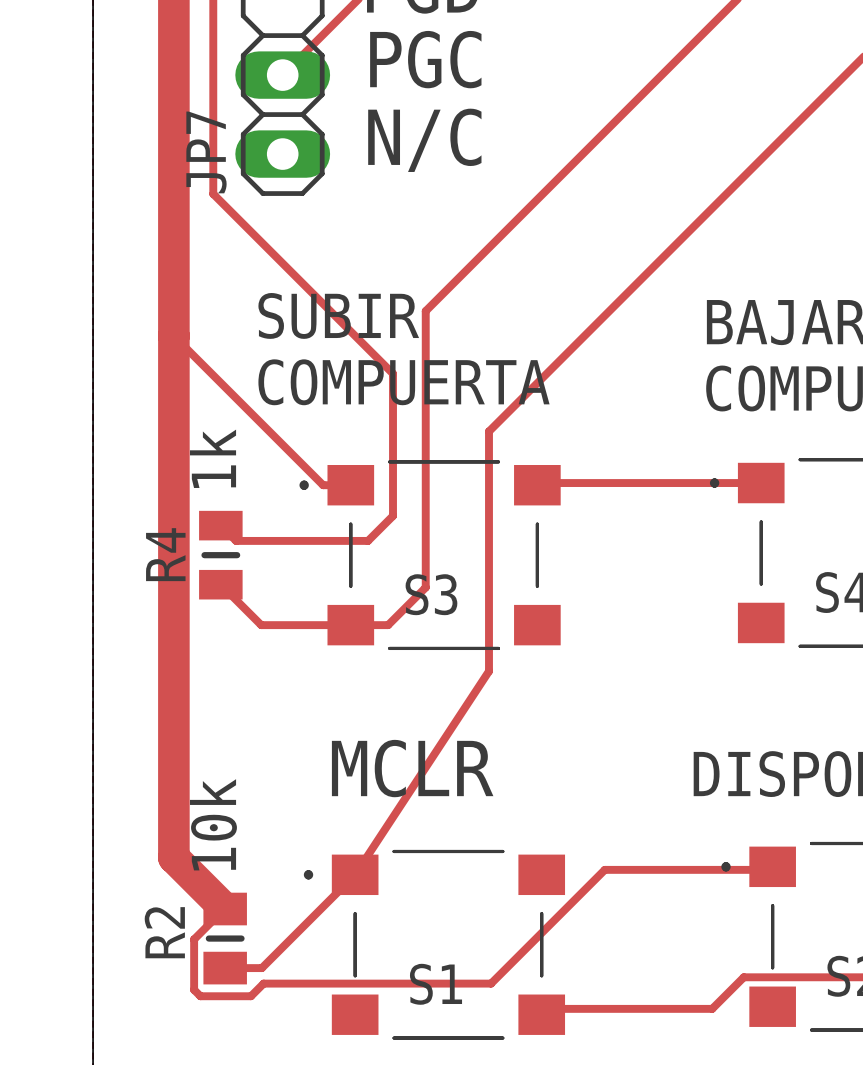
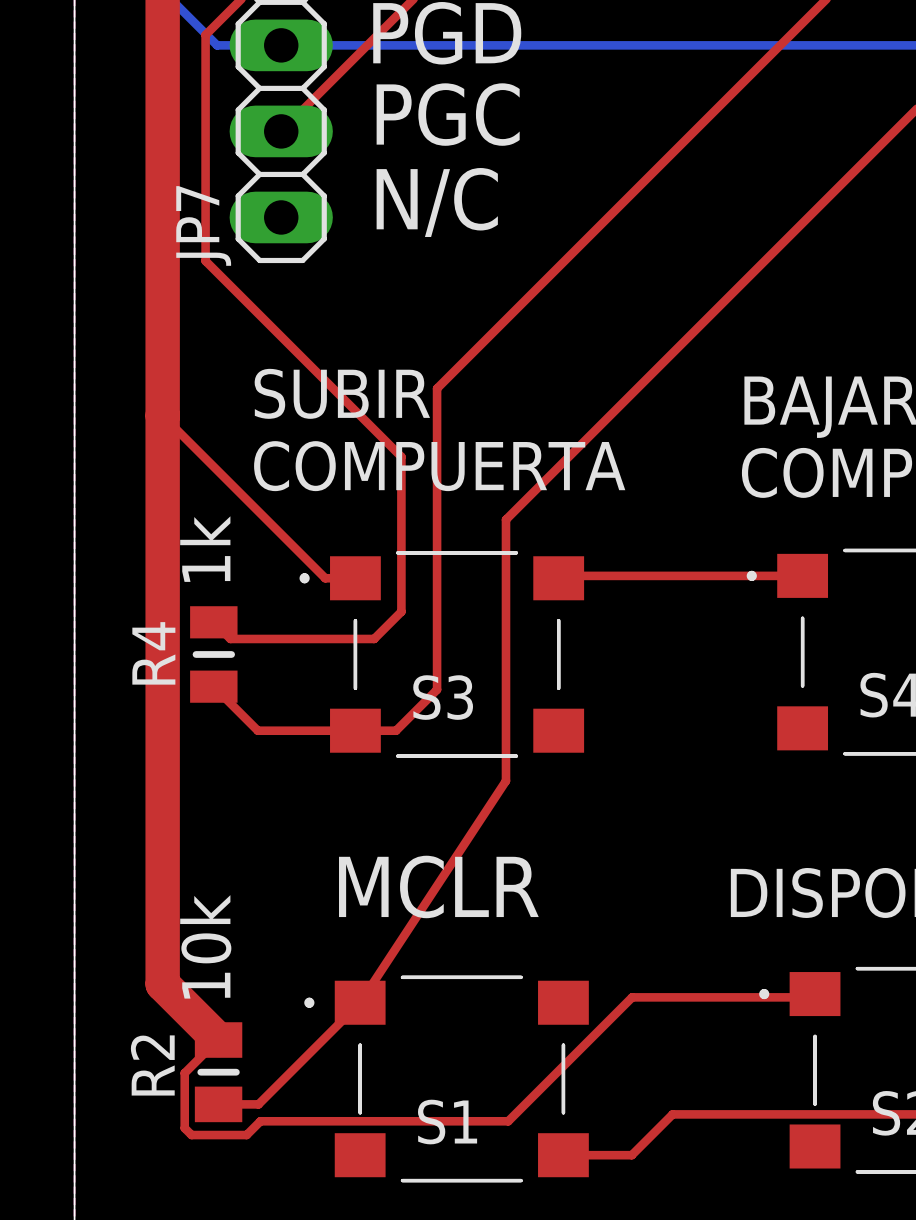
top track: (743, 977) (712, 1008) (547, 1008) (541, 1014) (543, 1013) -> (783, 1114) (672, 1114) (631, 1155) (563, 1155)

